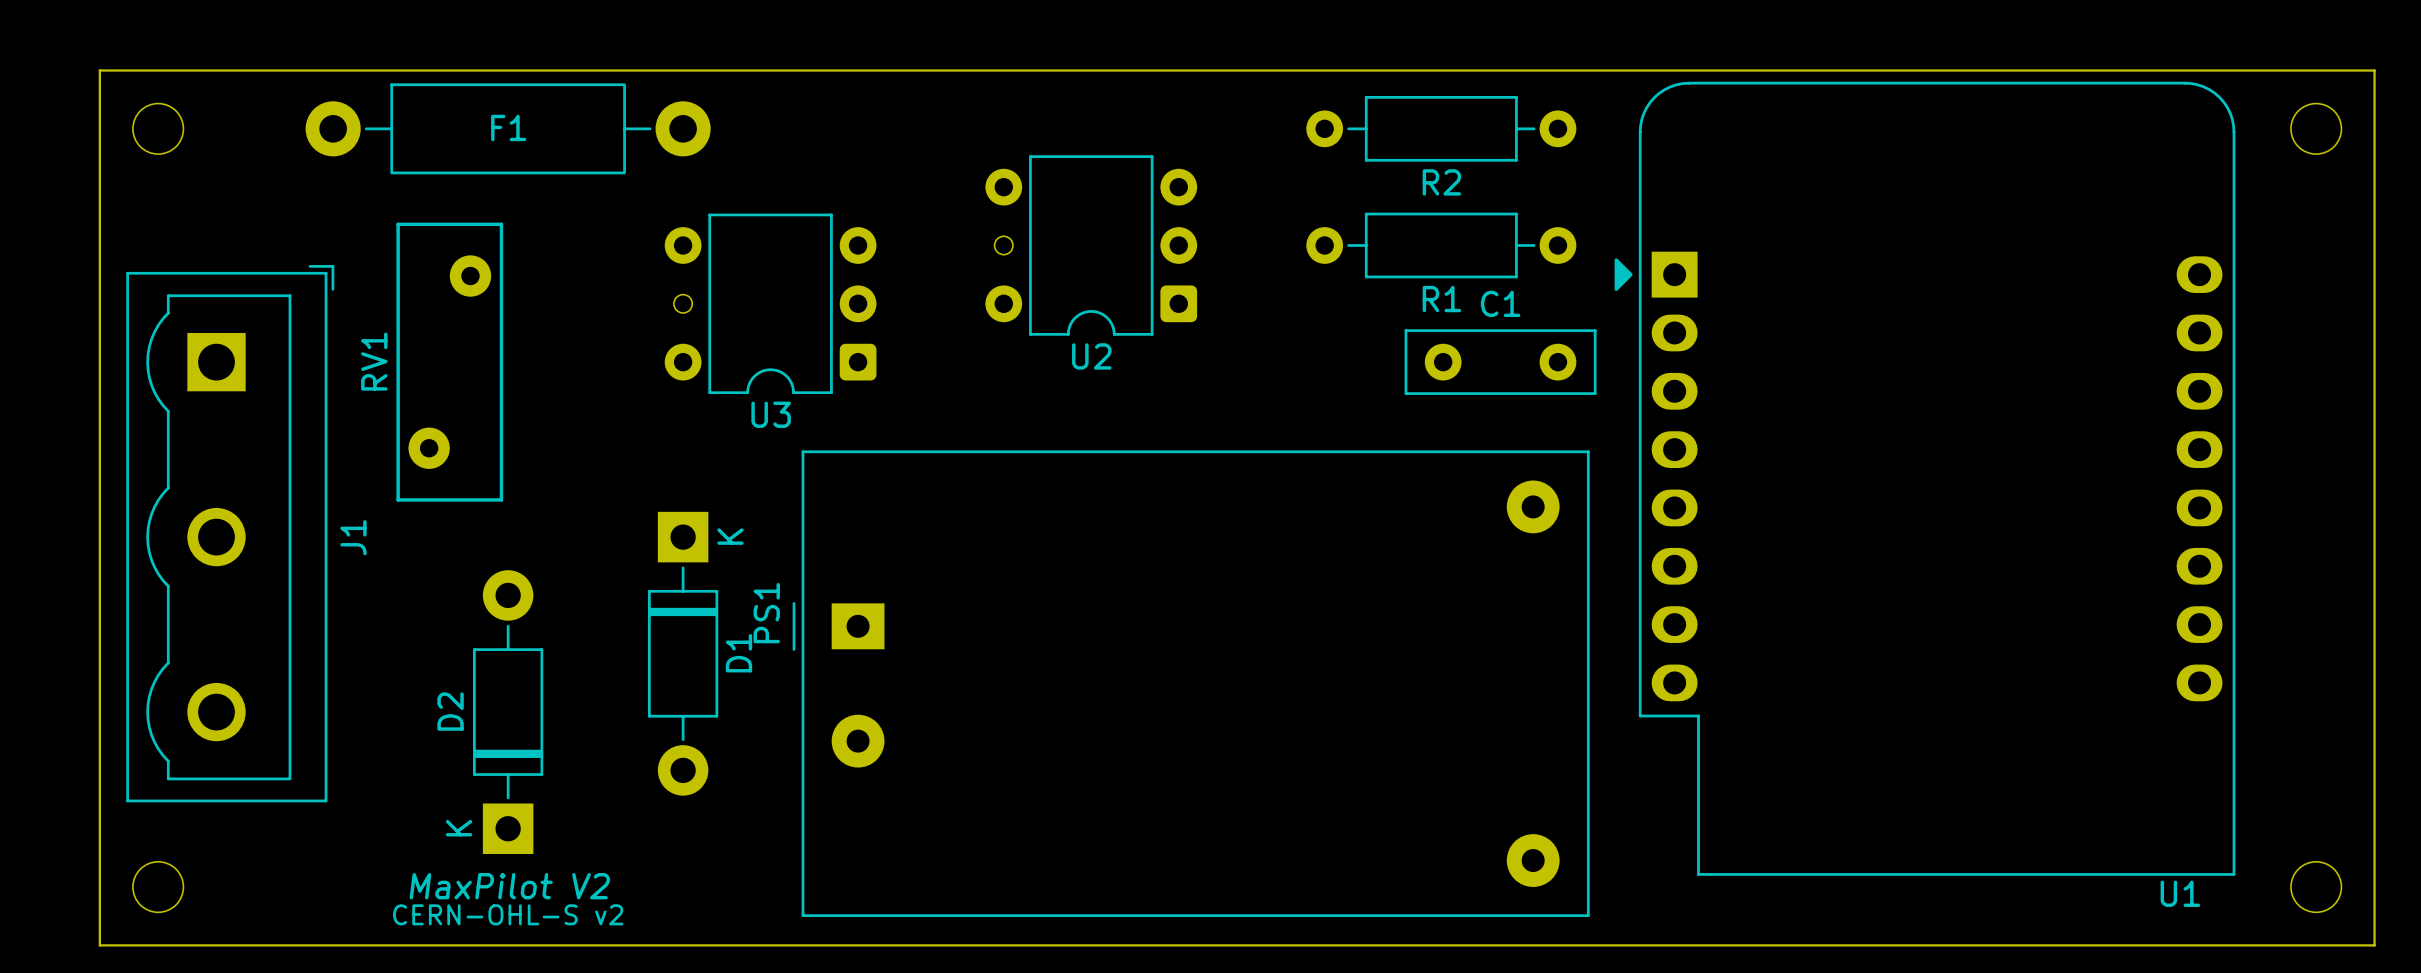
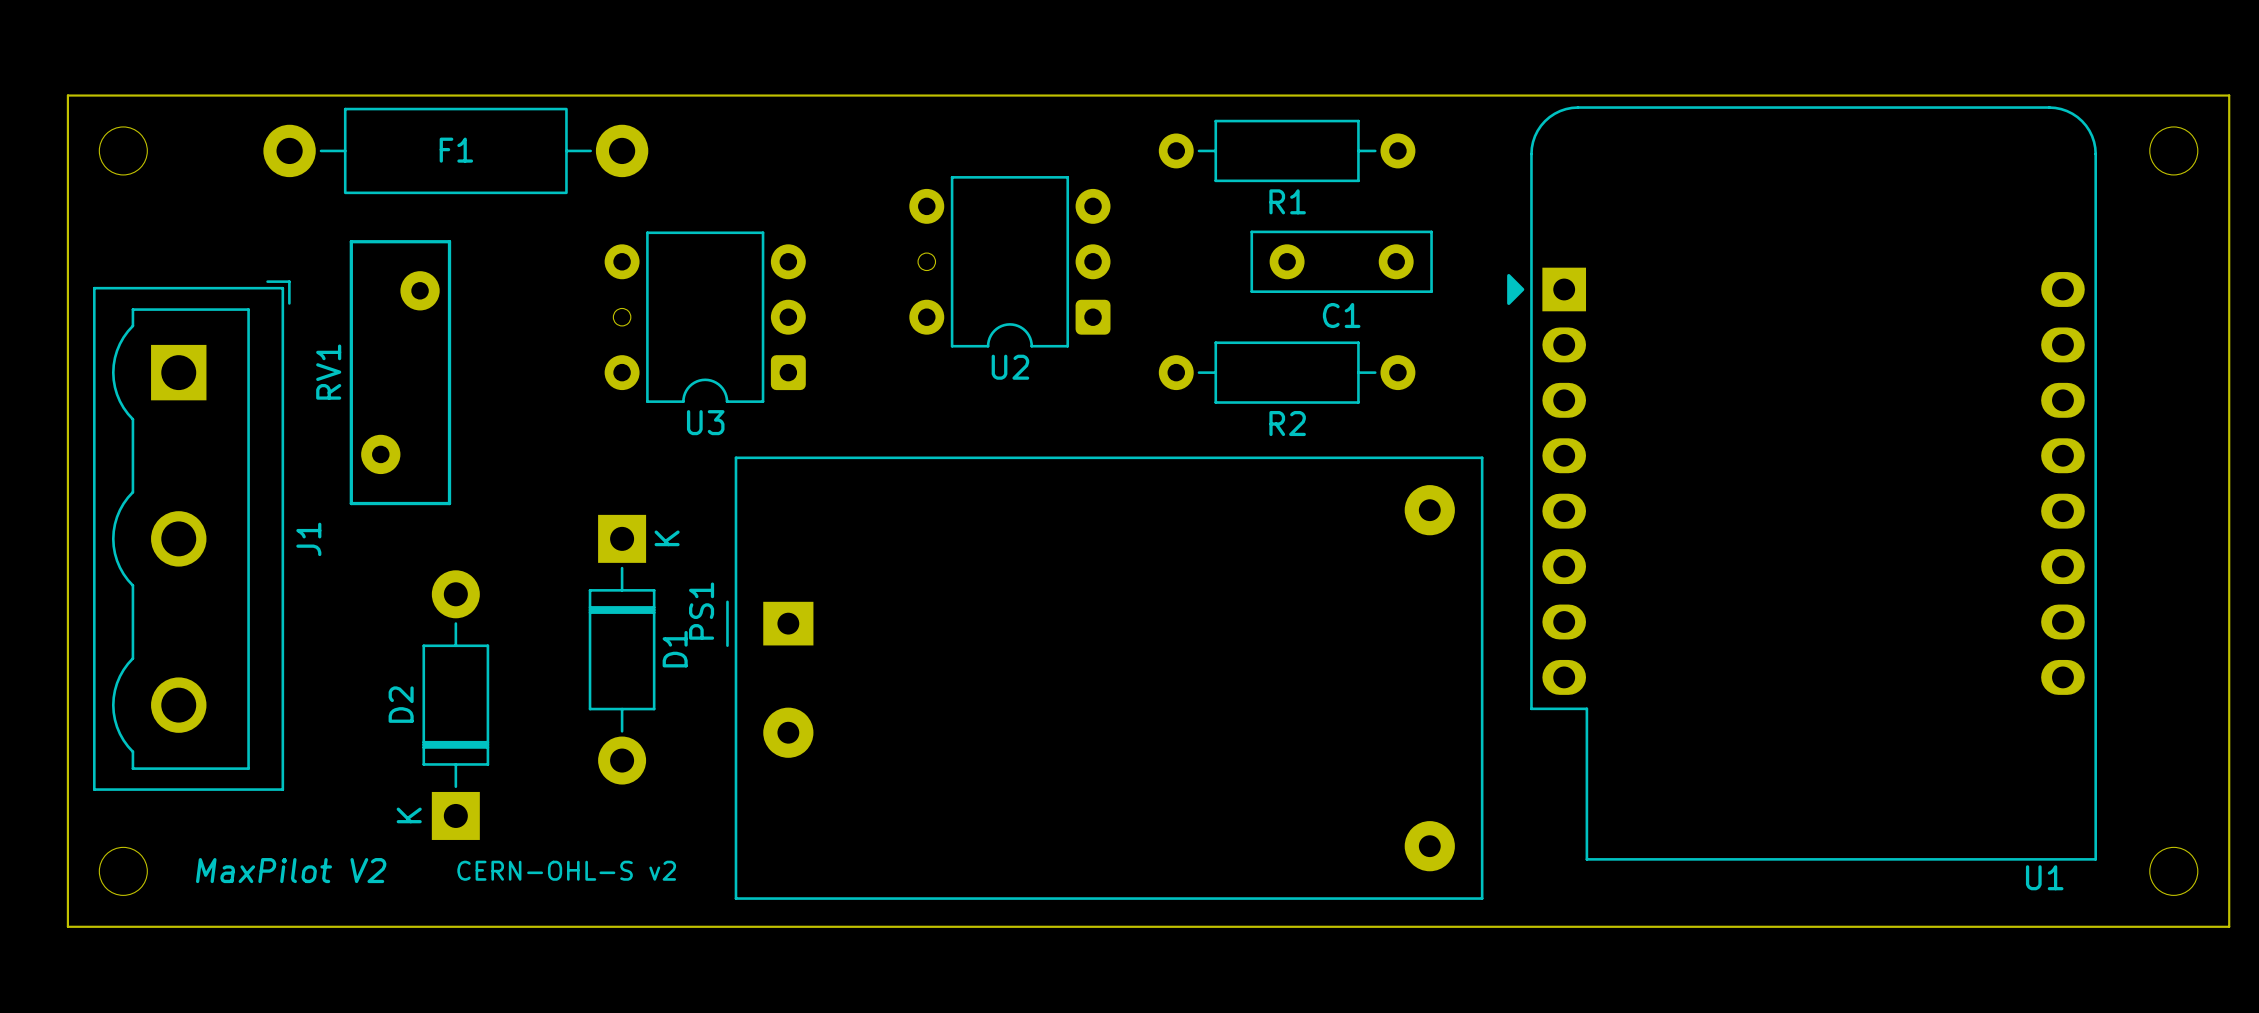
R2 position: (1441, 128) -> (1287, 372)
R1 position: (1441, 245) -> (1287, 150)
C1 name position: C1 (1500, 303) -> C1 (1341, 315)
C1 position: (1500, 362) -> (1341, 261)
text position: MaxPilot V2 (509, 886) -> MaxPilot V2 (291, 870)
text position: CERN-OHL-S v2 (508, 914) -> CERN-OHL-S v2 (566, 870)

